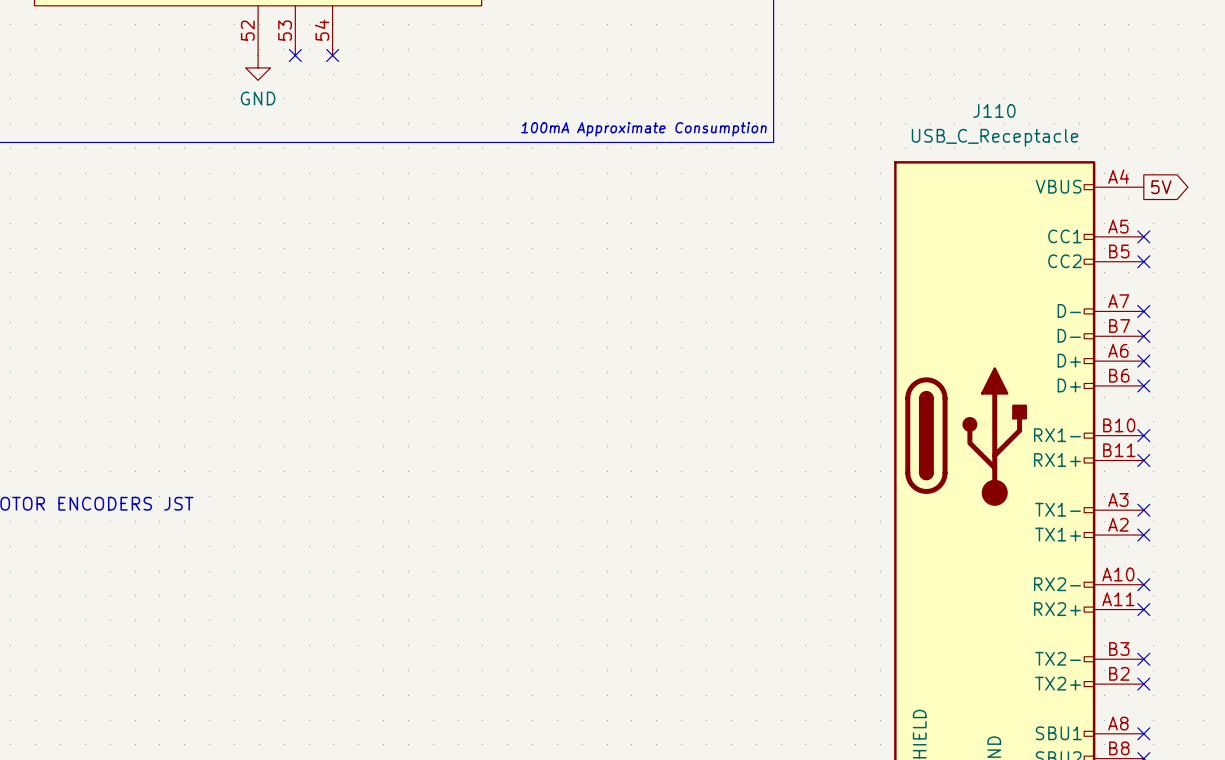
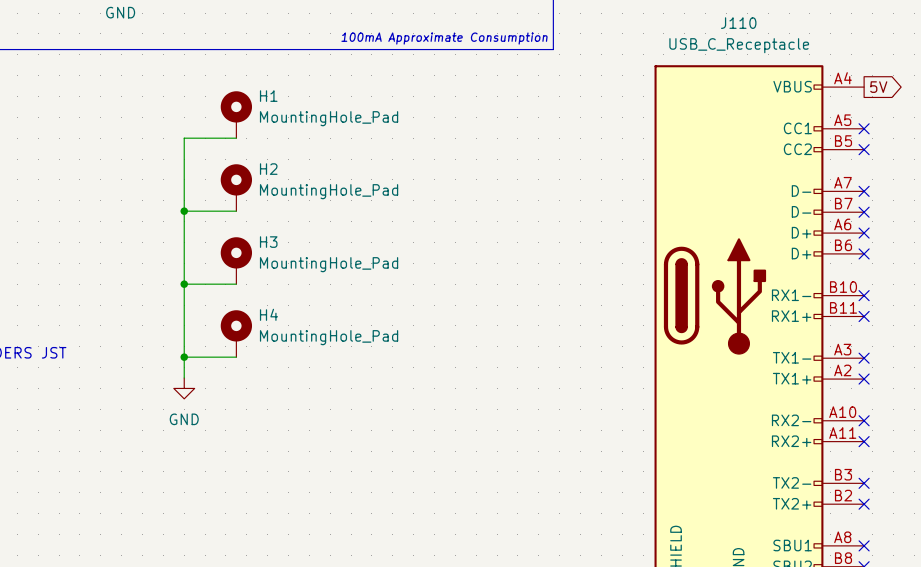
H1: none -> MountingHole_Pad (236, 114)
wire: none -> (236, 138) (184, 138) (184, 378)
H2: none -> MountingHole_Pad (236, 187)
wire: none -> (184, 211) (236, 211)
junction: none -> (184, 211)
H3: none -> MountingHole_Pad (236, 260)
wire: none -> (184, 284) (236, 284)
junction: none -> (184, 284)
H4: none -> MountingHole_Pad (236, 333)
wire: none -> (184, 357) (236, 357)
junction: none -> (184, 357)
power symbol: none -> GND (184, 388)

